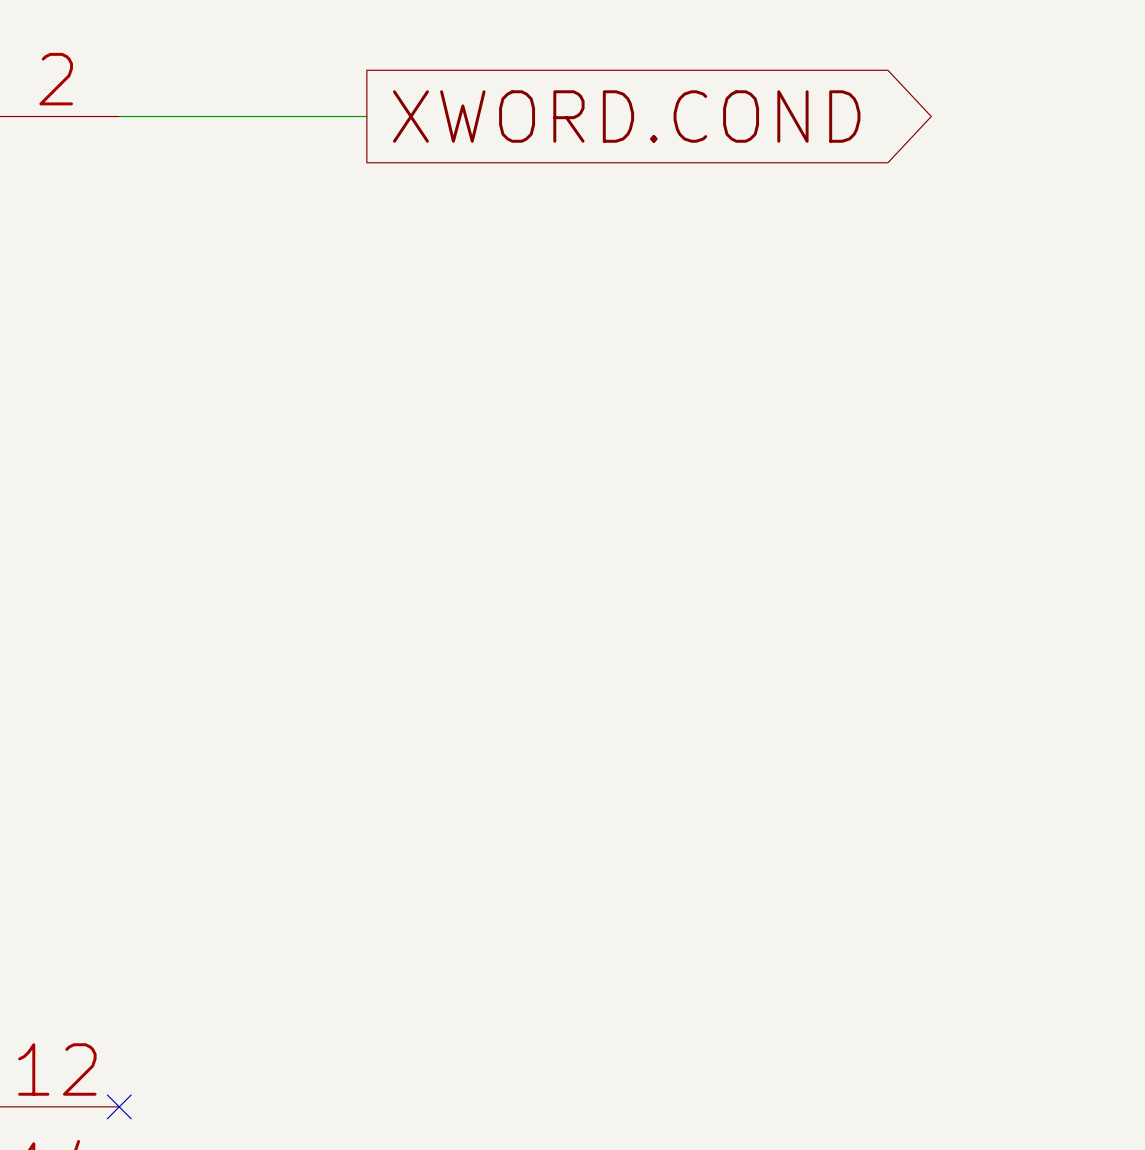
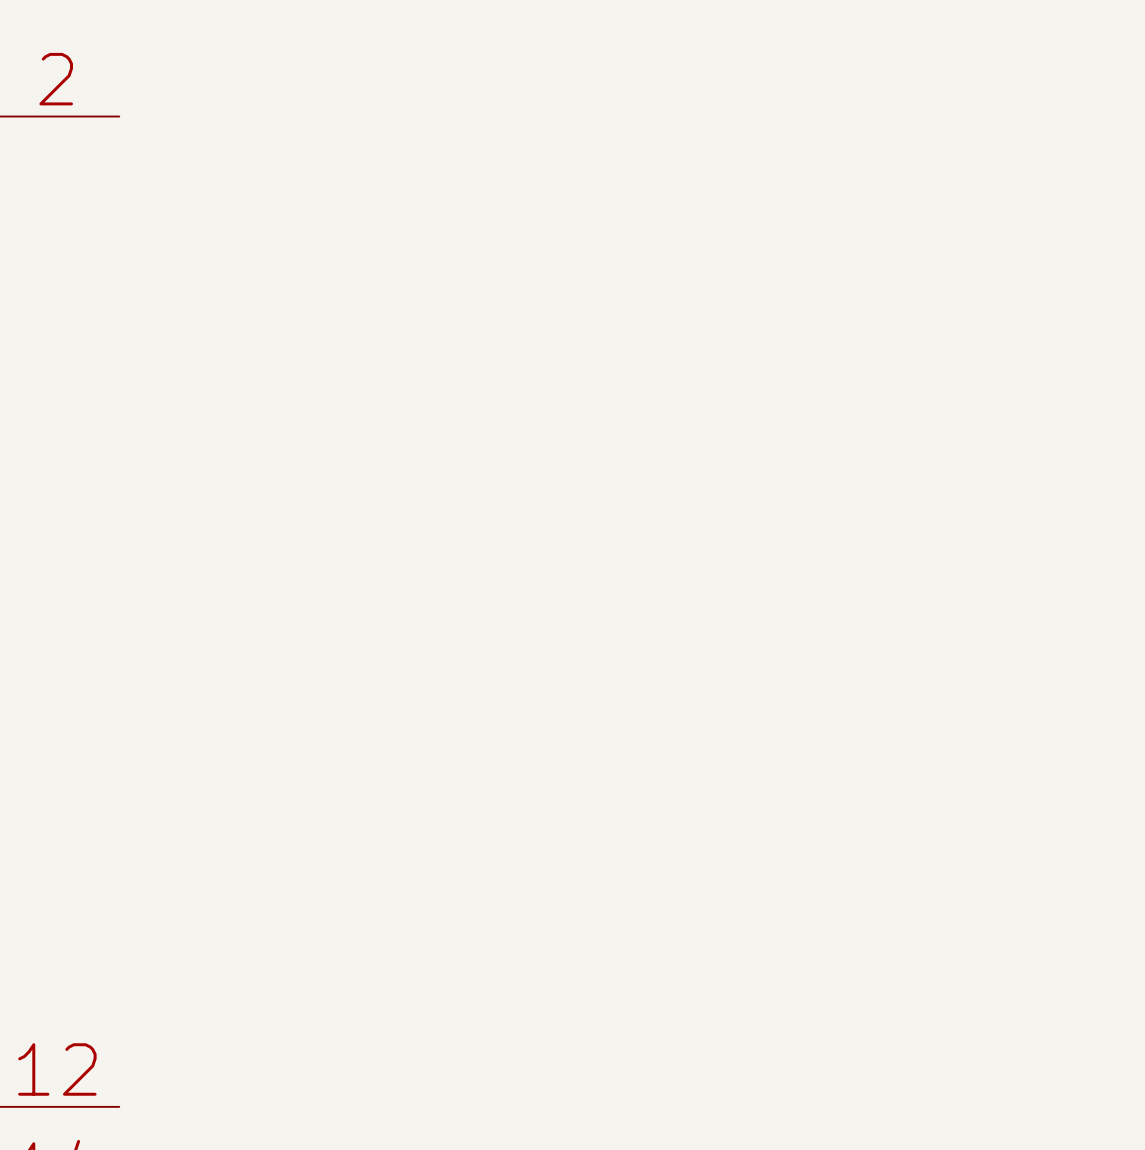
wire: (119, 116) (366, 116) -> none
global label: XWORD.COND (626, 116) -> none
no-connect mark: (119, 1106) -> none

